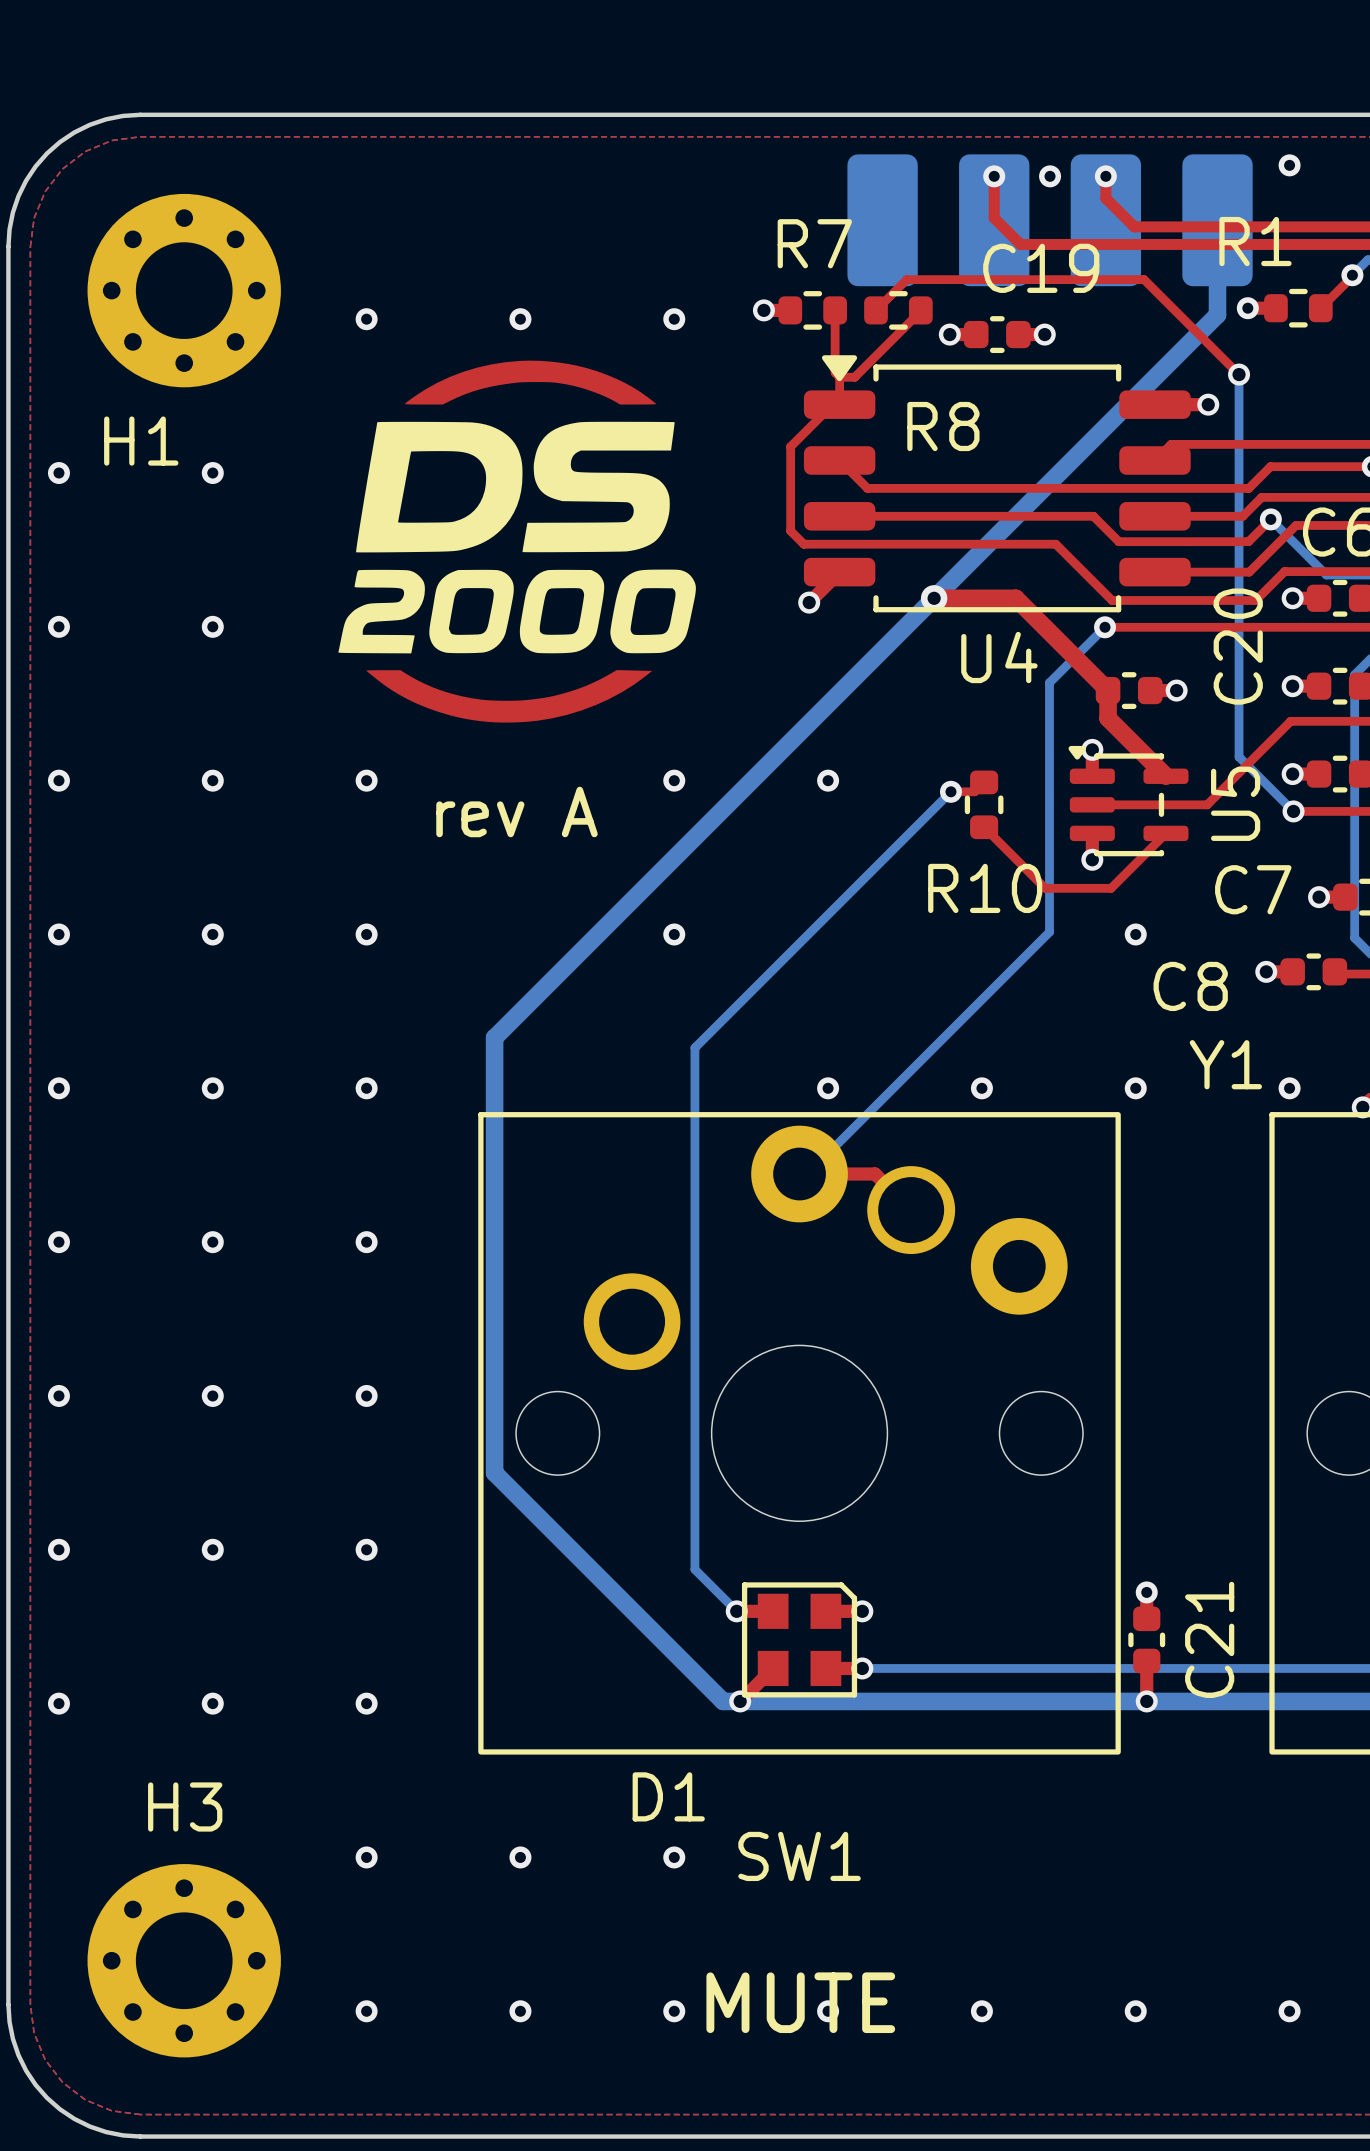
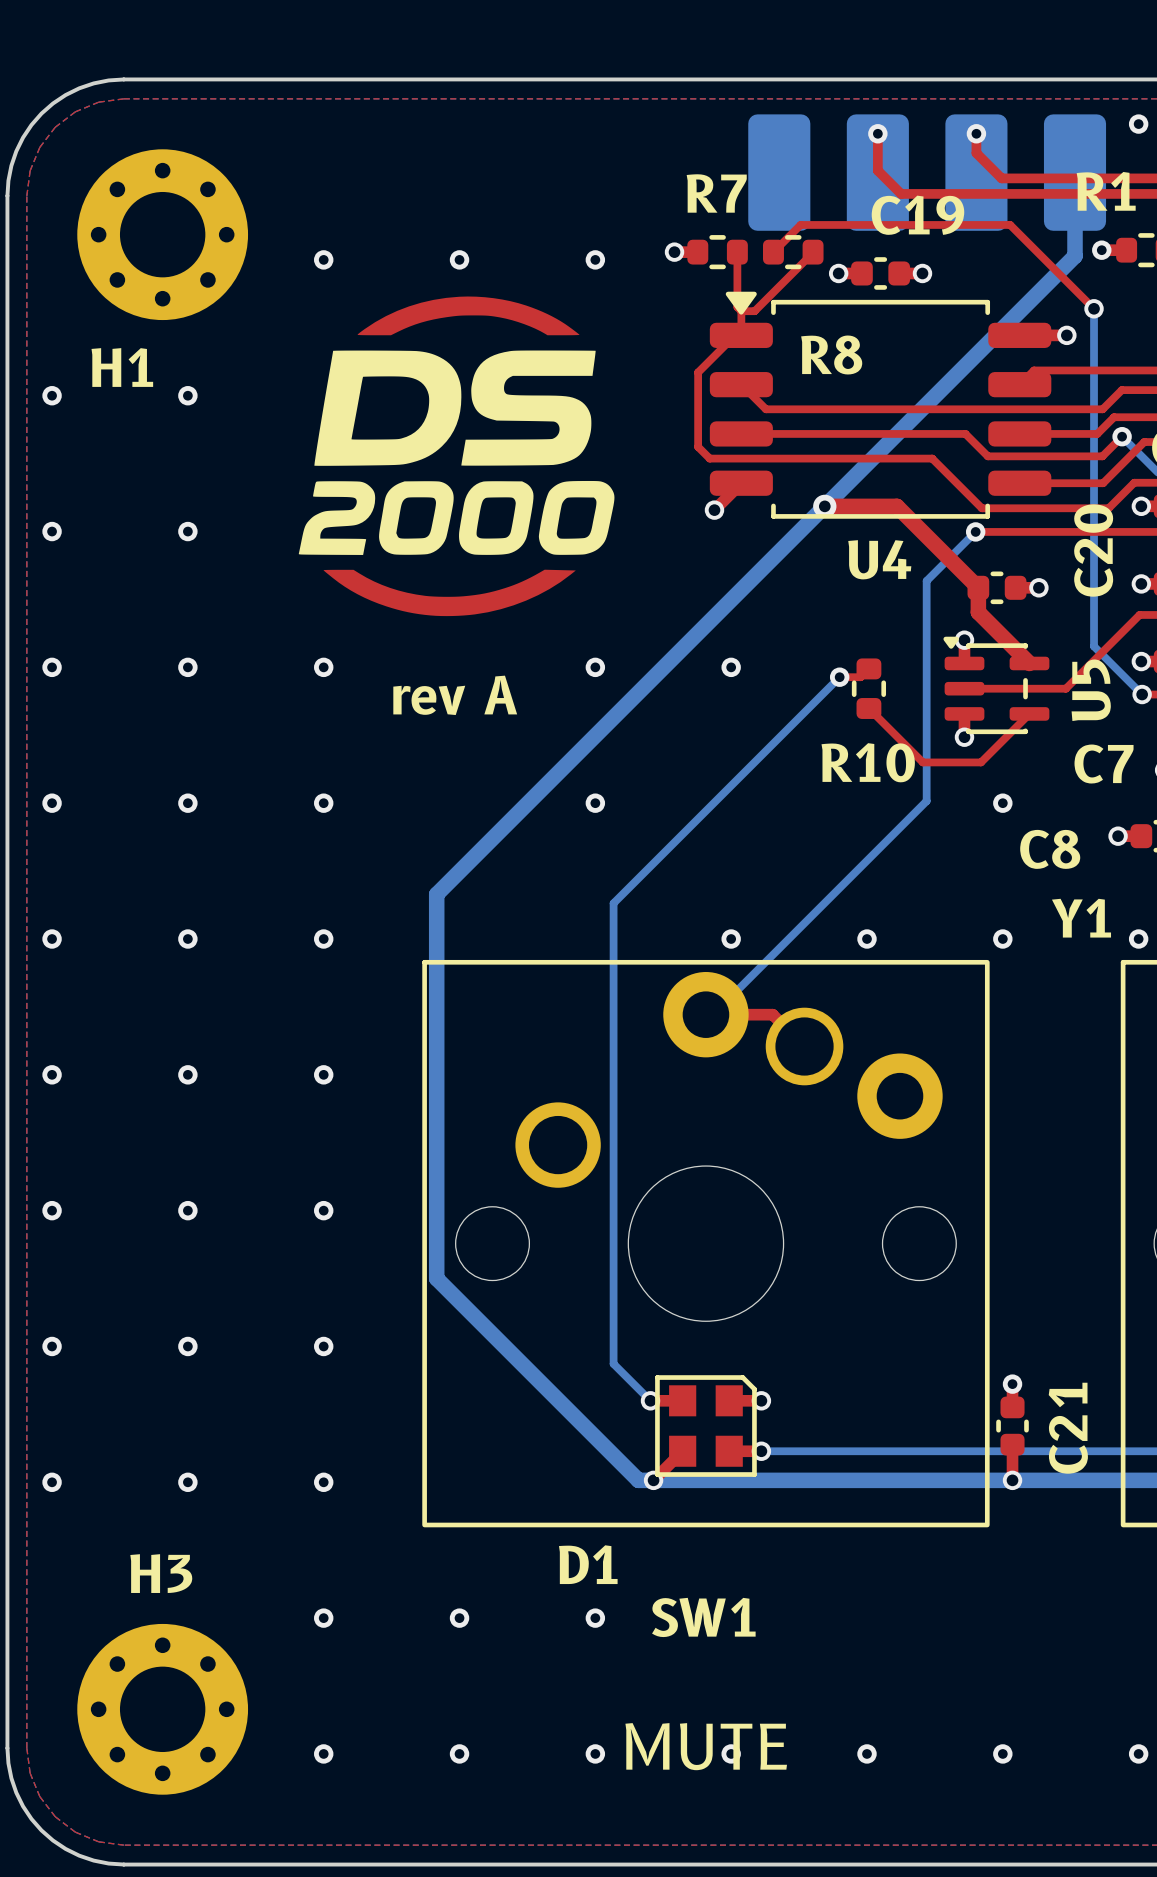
via: (1050, 176) -> none

